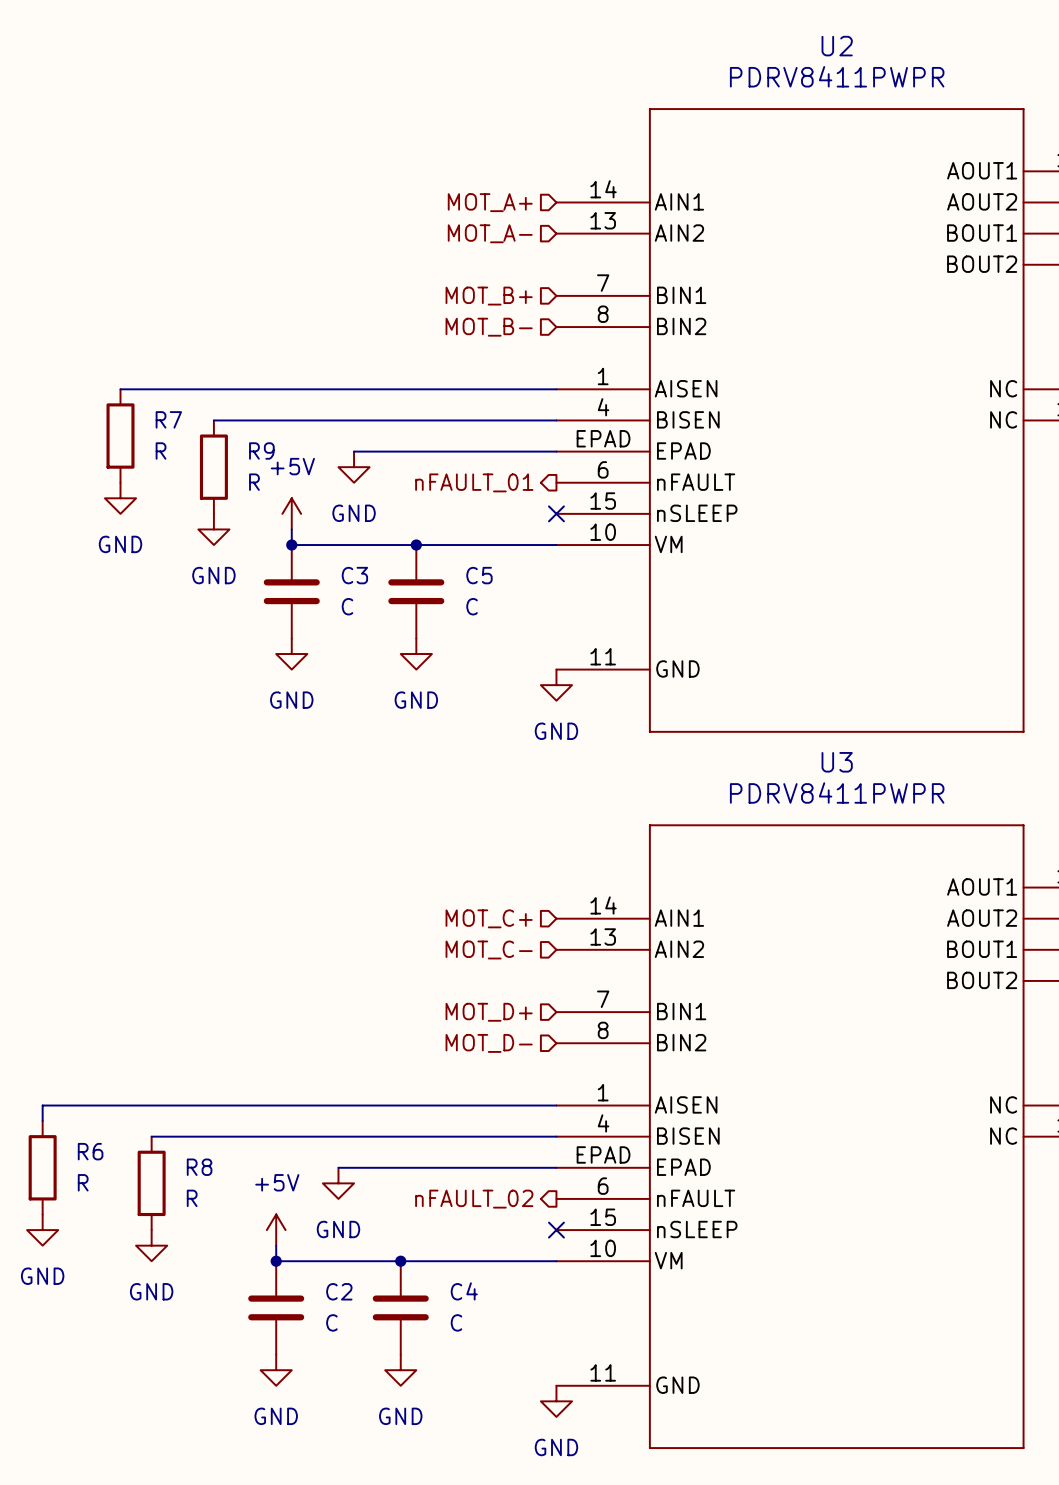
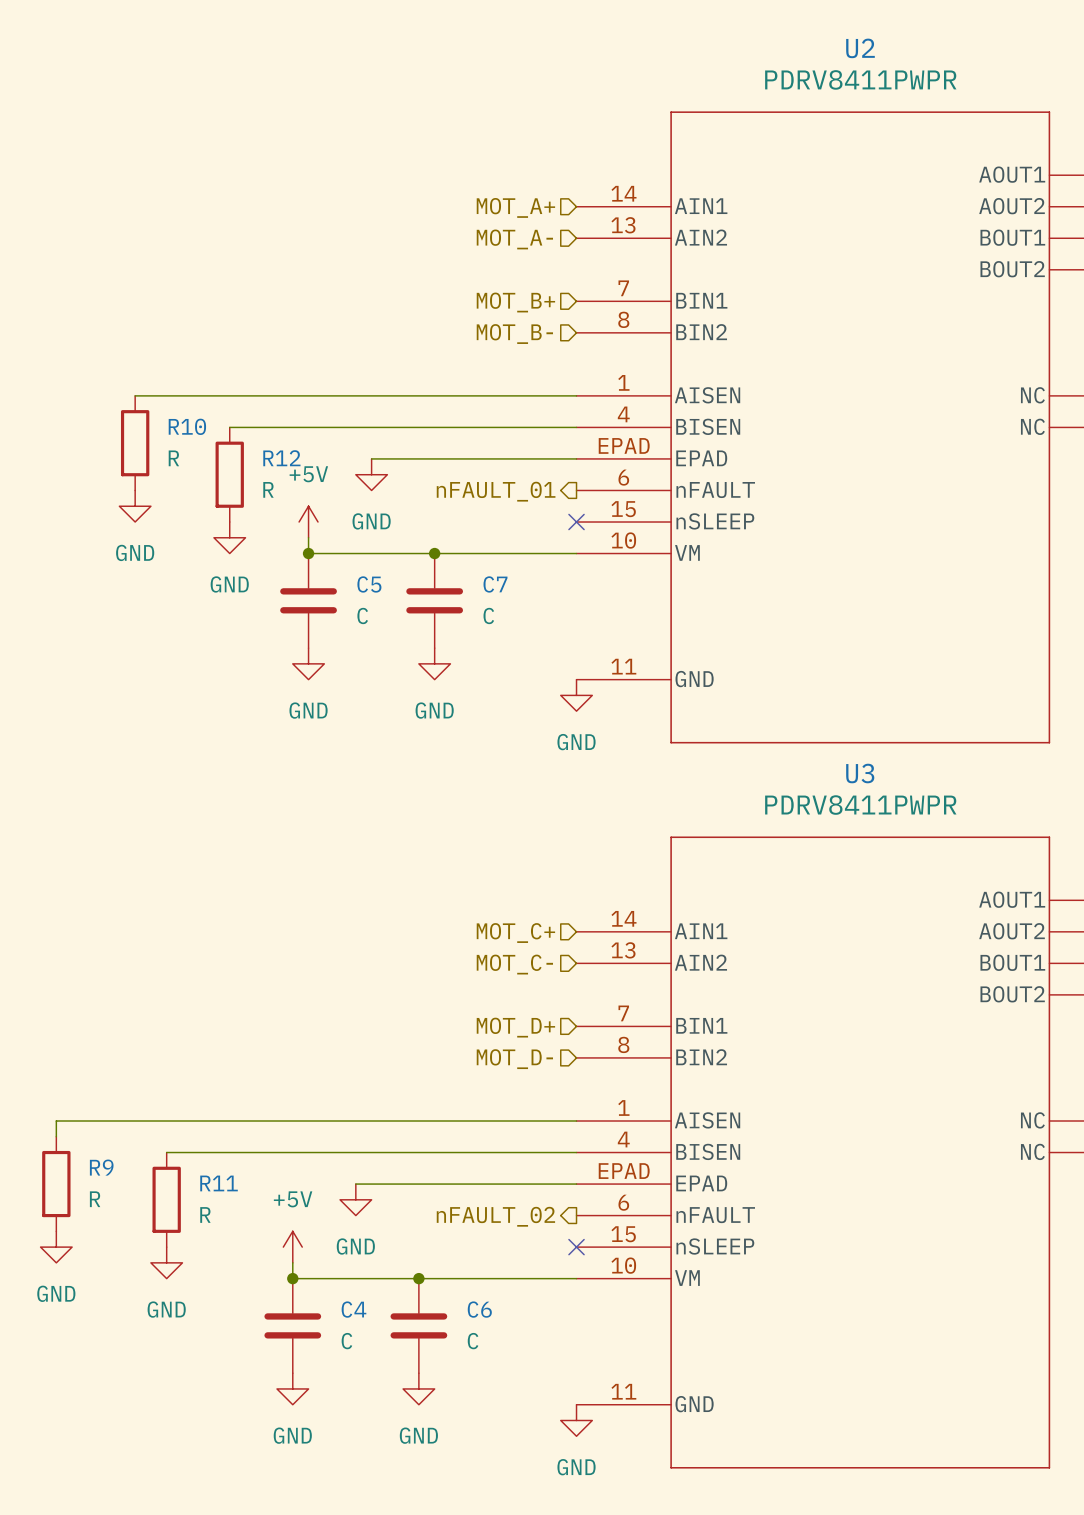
R7 name: R7 (168, 419) -> R10 (187, 426)
R9 name: R9 (261, 451) -> R12 (281, 458)
C3 name: C3 (354, 575) -> C5 (369, 584)
C5 name: C5 (479, 575) -> C7 (495, 584)
R6 name: R6 (90, 1151) -> R9 (101, 1167)
R8 name: R8 (199, 1167) -> R11 (219, 1183)
C2 name: C2 (339, 1291) -> C4 (353, 1309)
C4 name: C4 (464, 1291) -> C6 (479, 1309)

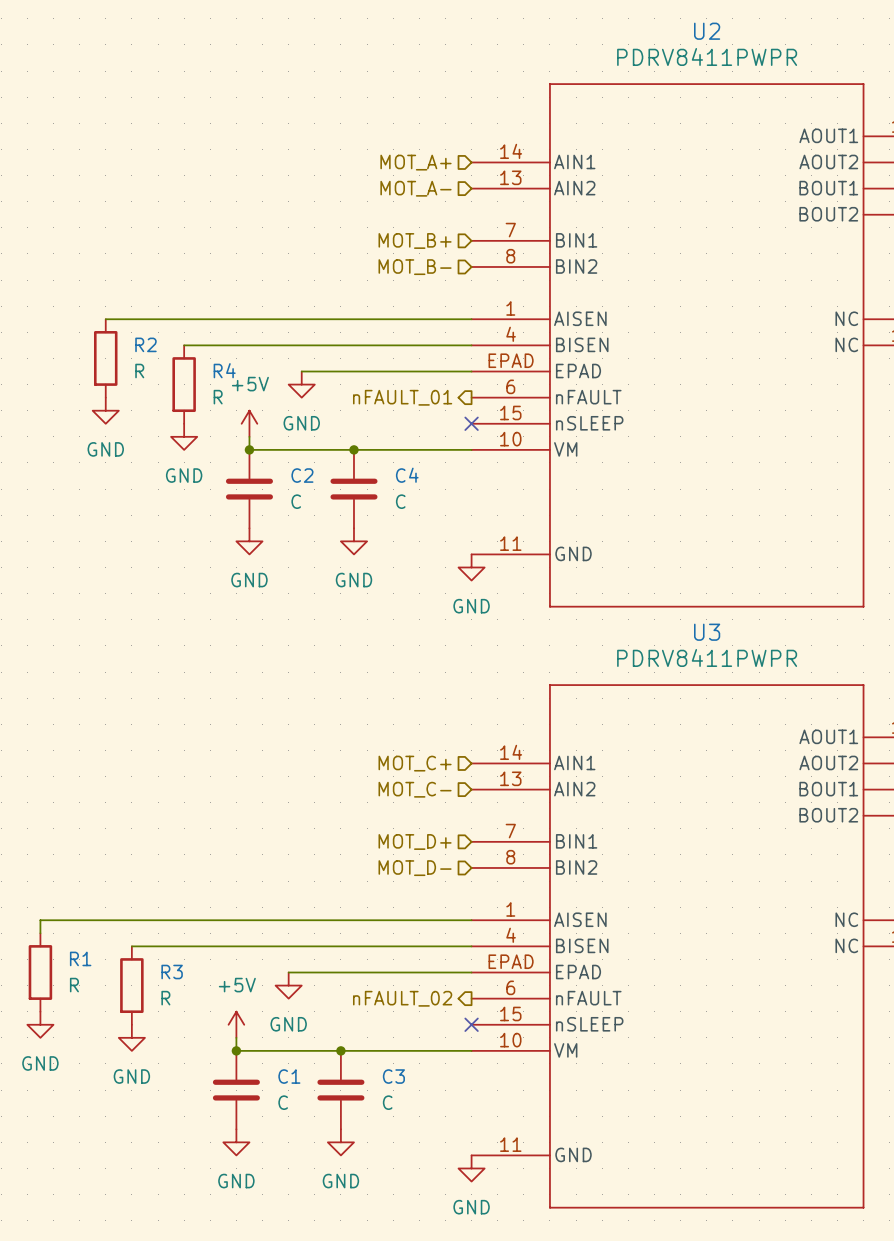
R10 name: R10 (187, 426) -> R2 (145, 344)
R12 name: R12 (281, 458) -> R4 (224, 370)
C5 name: C5 (369, 584) -> C2 (302, 475)
C7 name: C7 (495, 584) -> C4 (407, 475)
R9 name: R9 (101, 1167) -> R1 (80, 958)
R11 name: R11 (219, 1183) -> R3 (172, 972)
C4 name: C4 (353, 1309) -> C1 (289, 1076)
C6 name: C6 (479, 1309) -> C3 (393, 1076)

